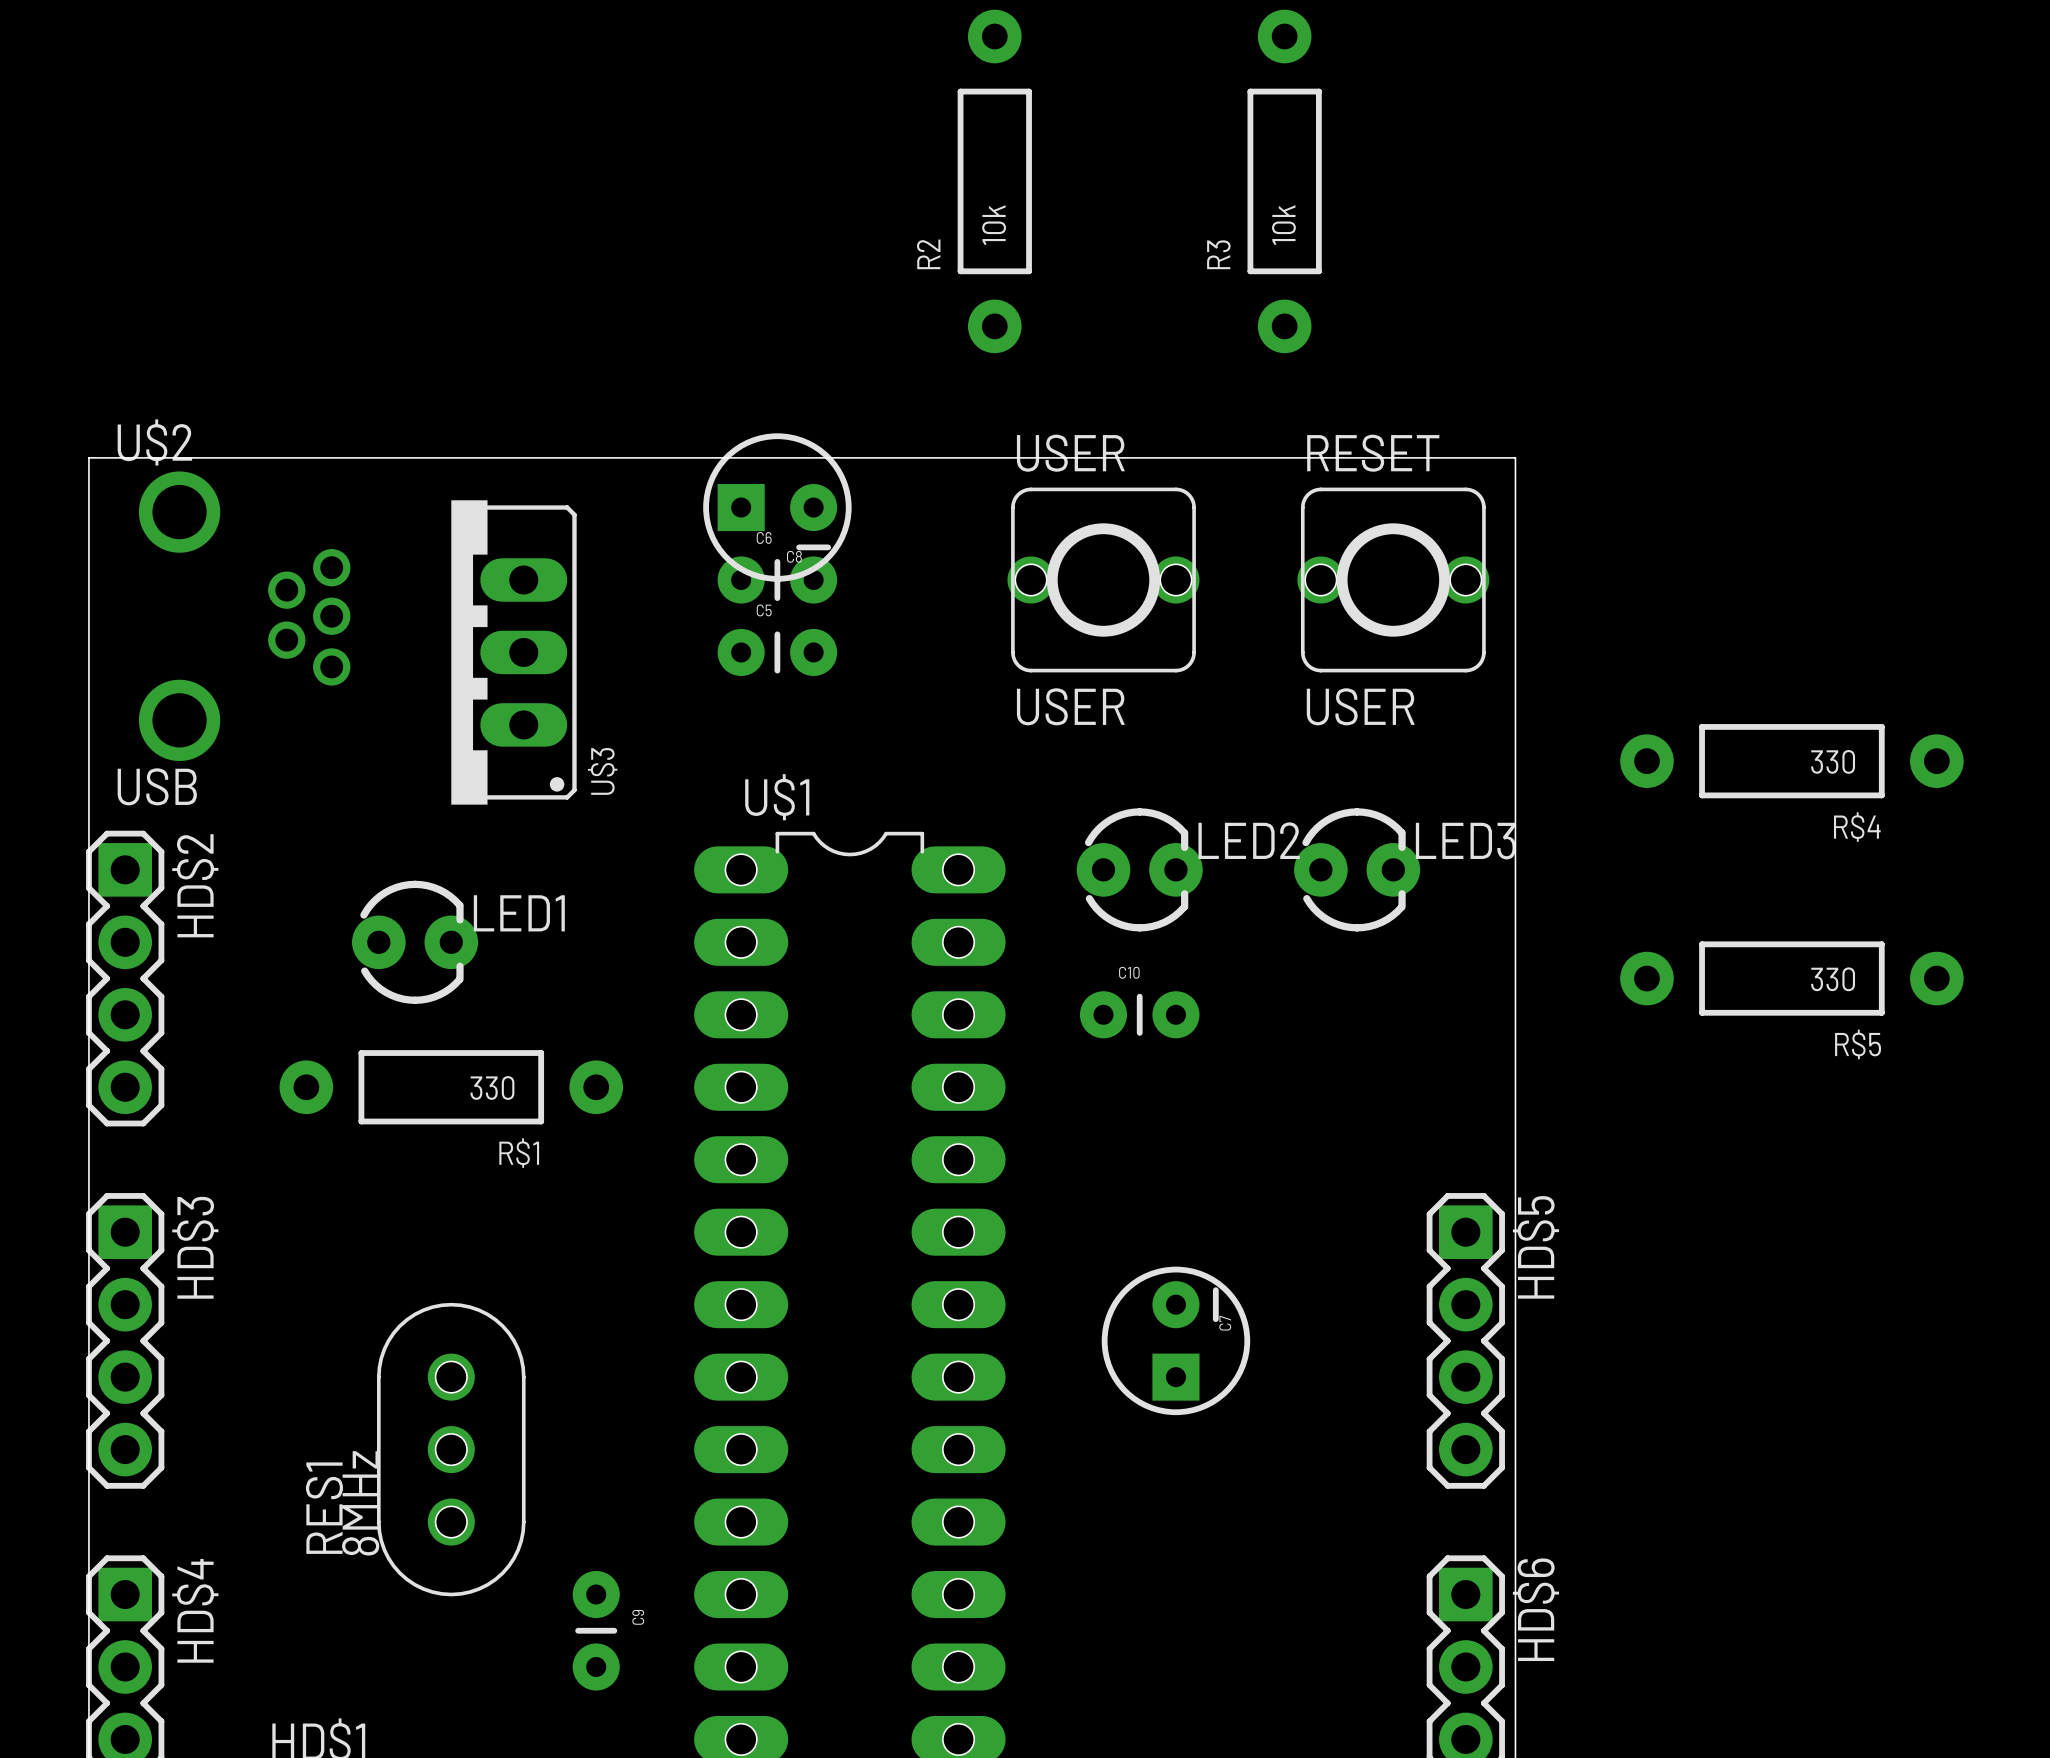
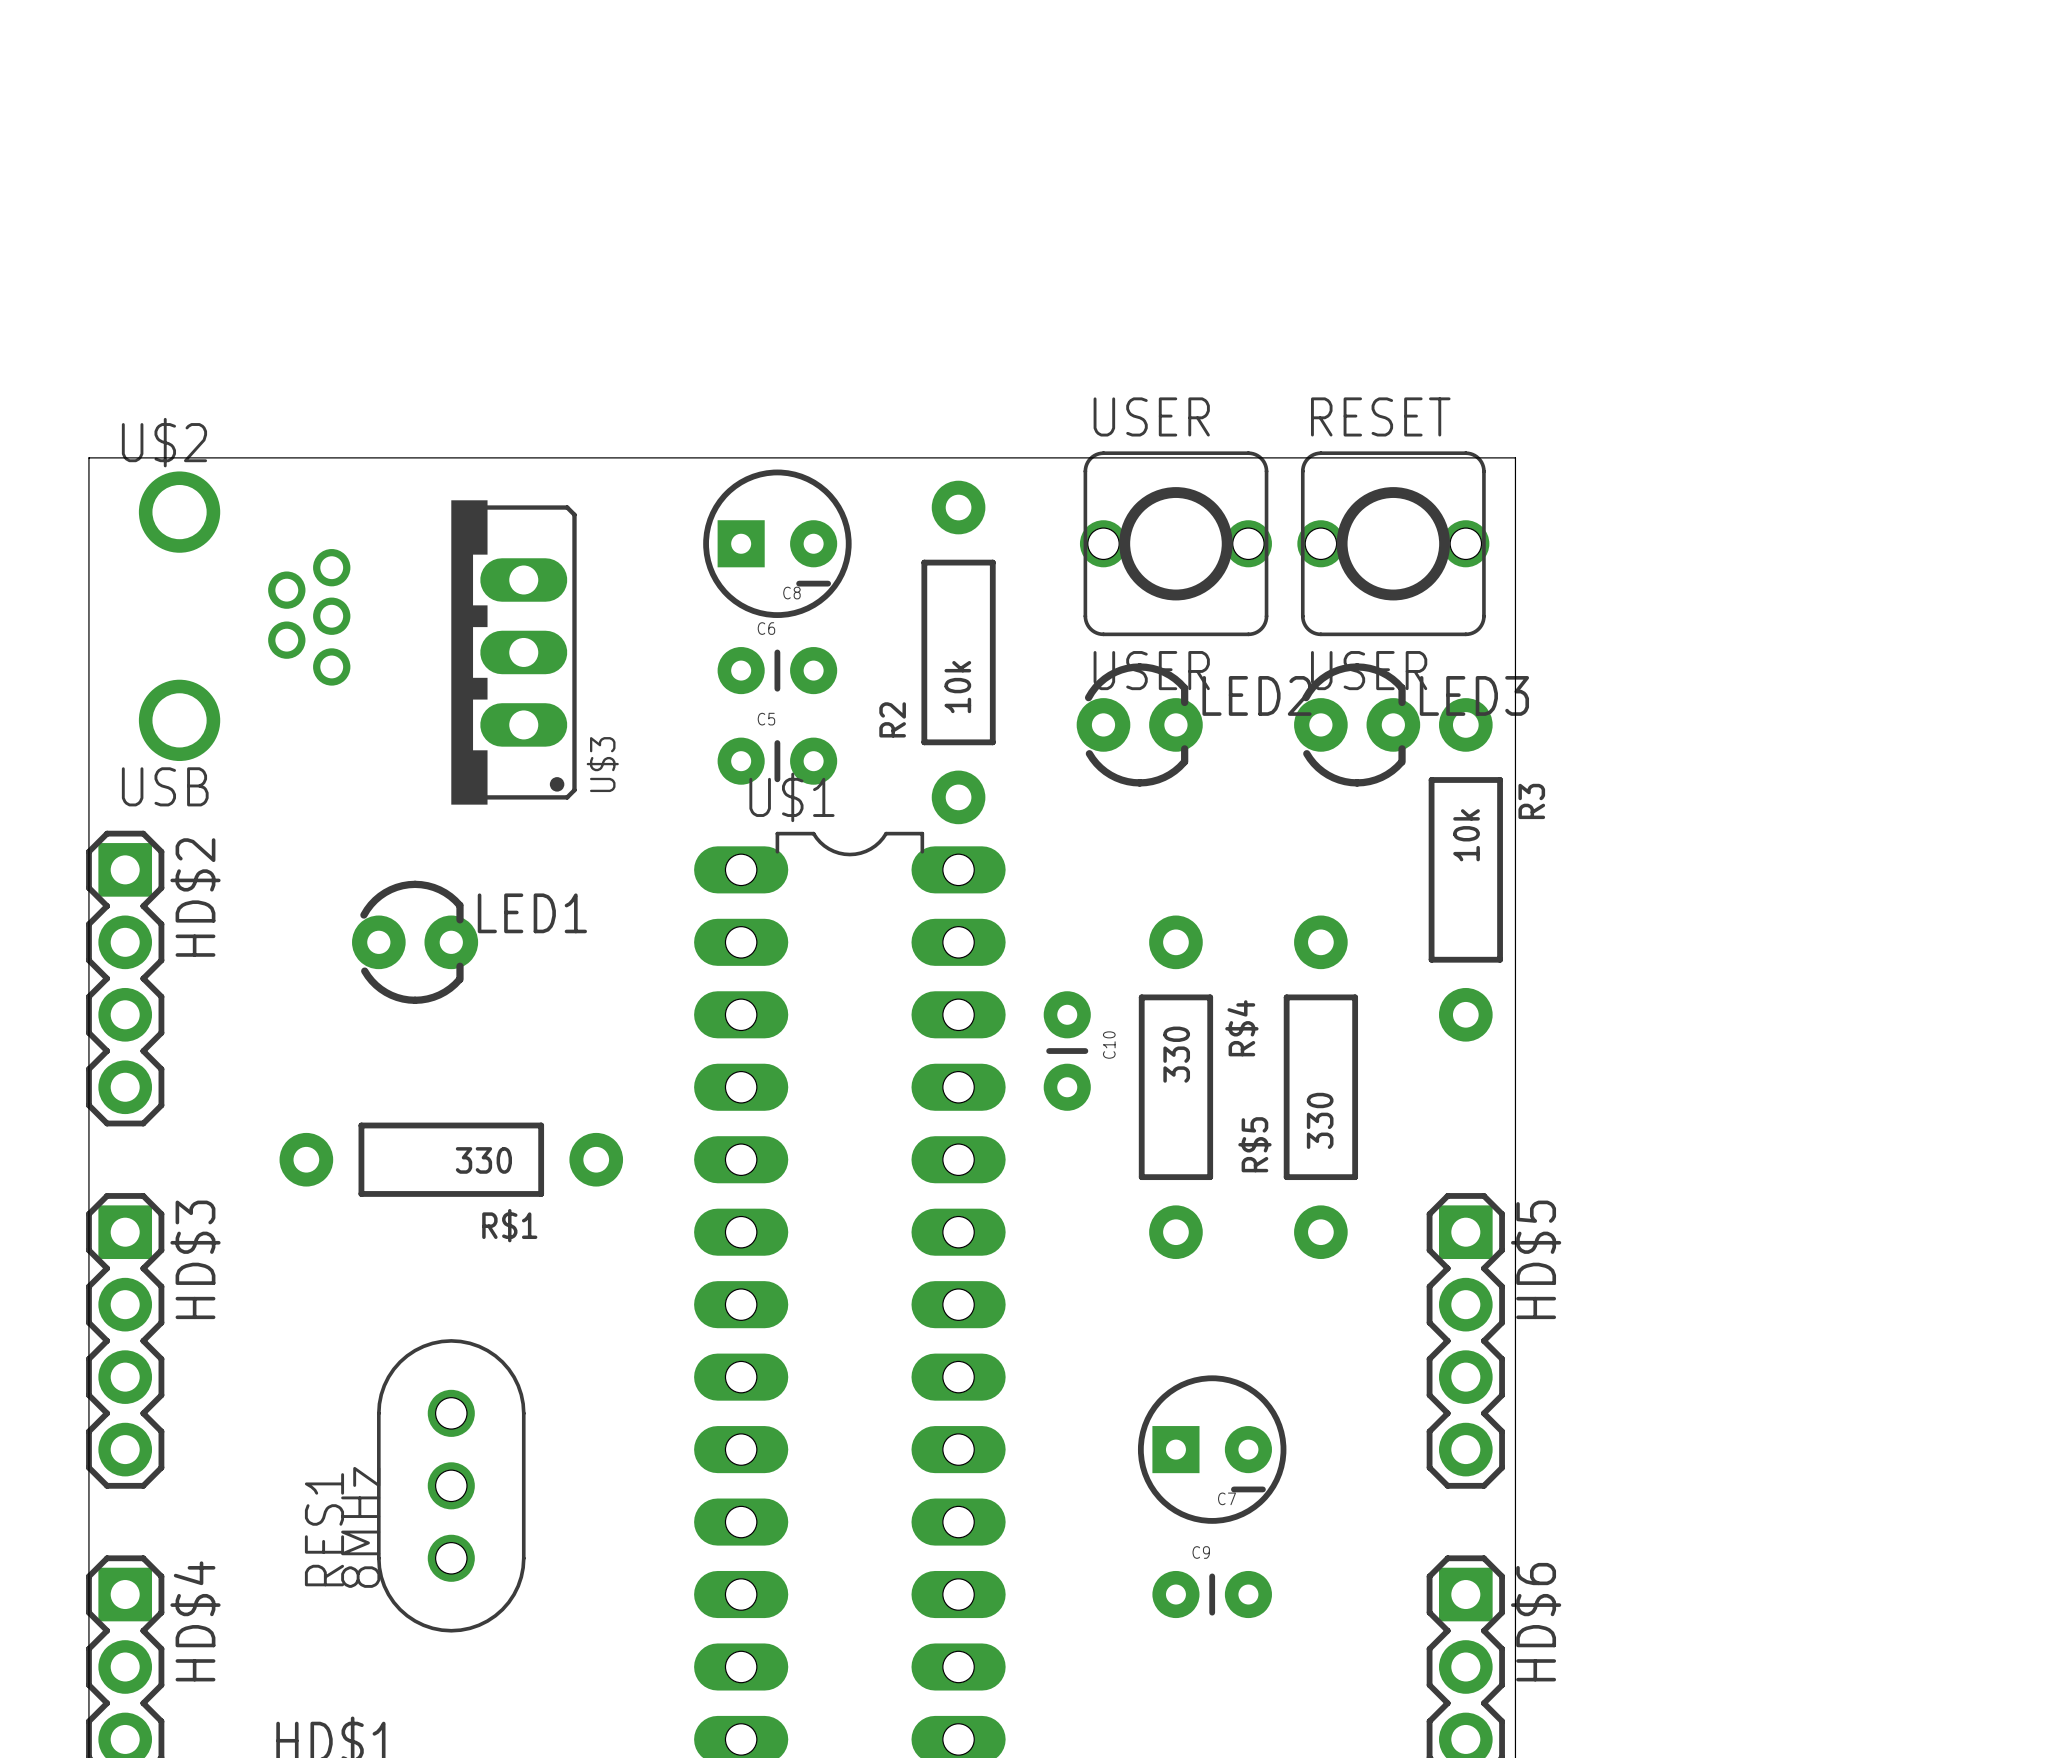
R2 position: (994, 181) -> (958, 652)
R3 position: (1284, 181) -> (1465, 869)
R3 value position: 10k (1283, 225) -> 10k (1466, 835)
R3 name position: R3 (1218, 254) -> R3 (1531, 801)
C8 position: (777, 507) -> (777, 543)
C6 position: (777, 580) -> (777, 670)
USER position: (1103, 580) -> (1175, 543)
RESET position: (1393, 580) -> (1393, 543)
C5 position: (777, 652) -> (777, 761)
R$4 rotation: 0° (1791, 761) -> 90° clockwise (1175, 1087)
R$4 position: (1791, 761) -> (1175, 1087)
R$4 name position: R$4 (1857, 827) -> R$4 (1241, 1028)
LED2 position: (1139, 869) -> (1139, 724)
LED3 position: (1357, 869) -> (1357, 724)
R$5 rotation: 0° (1791, 978) -> 90° clockwise (1320, 1087)
R$5 position: (1791, 978) -> (1320, 1087)
C10 rotation: 0° (1139, 1014) -> 90° clockwise (1067, 1051)
C10 position: (1139, 1014) -> (1067, 1051)
R$1 position: (451, 1087) -> (451, 1159)
C7 rotation: 0° (1175, 1340) -> 90° clockwise (1212, 1449)
C7 position: (1175, 1340) -> (1212, 1449)
RES1 position: (451, 1449) -> (451, 1485)
C9 name position: C9 (638, 1617) -> C9 (1201, 1552)
C9 rotation: 0° (596, 1630) -> 90° clockwise (1212, 1594)
C9 position: (596, 1630) -> (1212, 1594)

